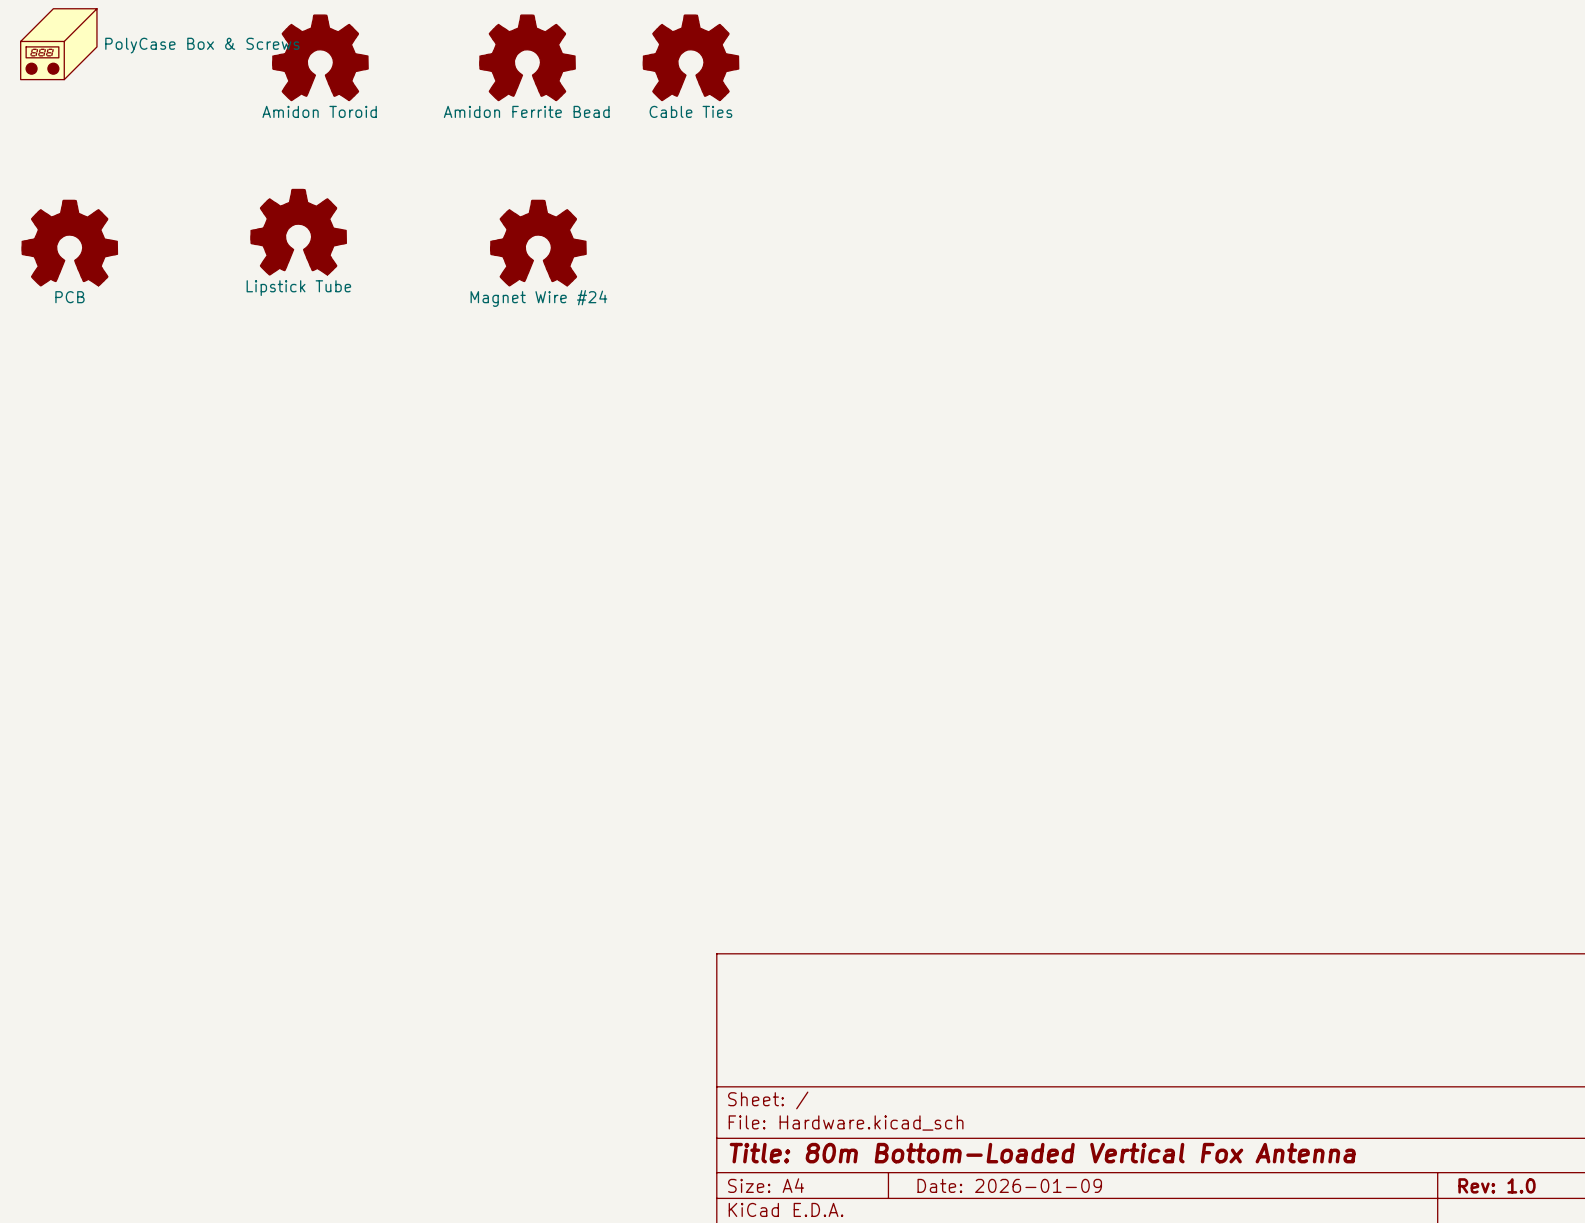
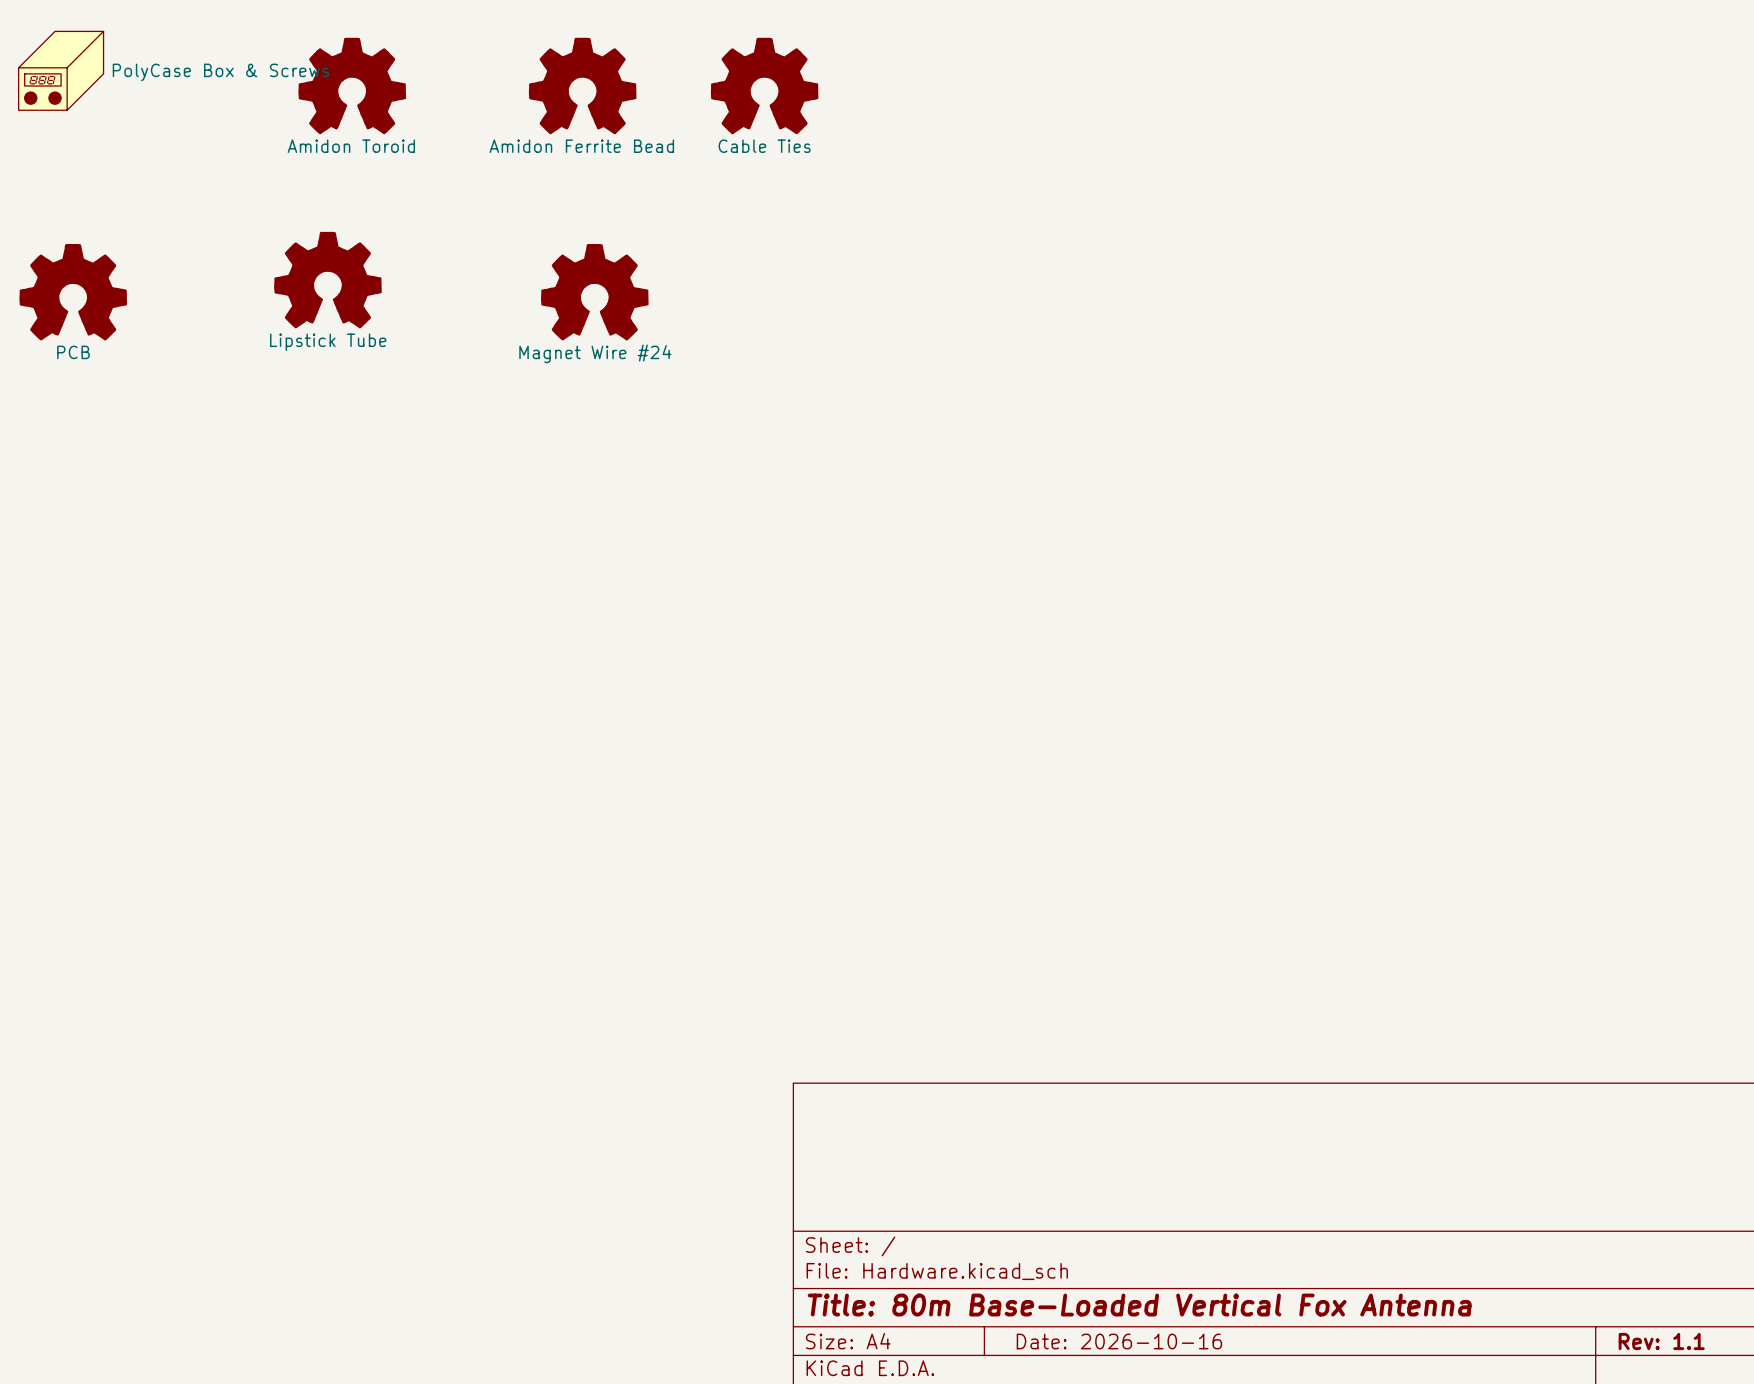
title block: Title: 80m Bottom-Loaded Vertical Fox Antenna (1042, 1153) -> Title: 80m Base-Loaded Vertical Fox Antenna (1139, 1305)
title block: Date: 2026-01-09 (1009, 1185) -> Date: 2026-10-16 (1119, 1341)
title block: Rev: 1.0 (1497, 1185) -> Rev: 1.1 (1661, 1341)

